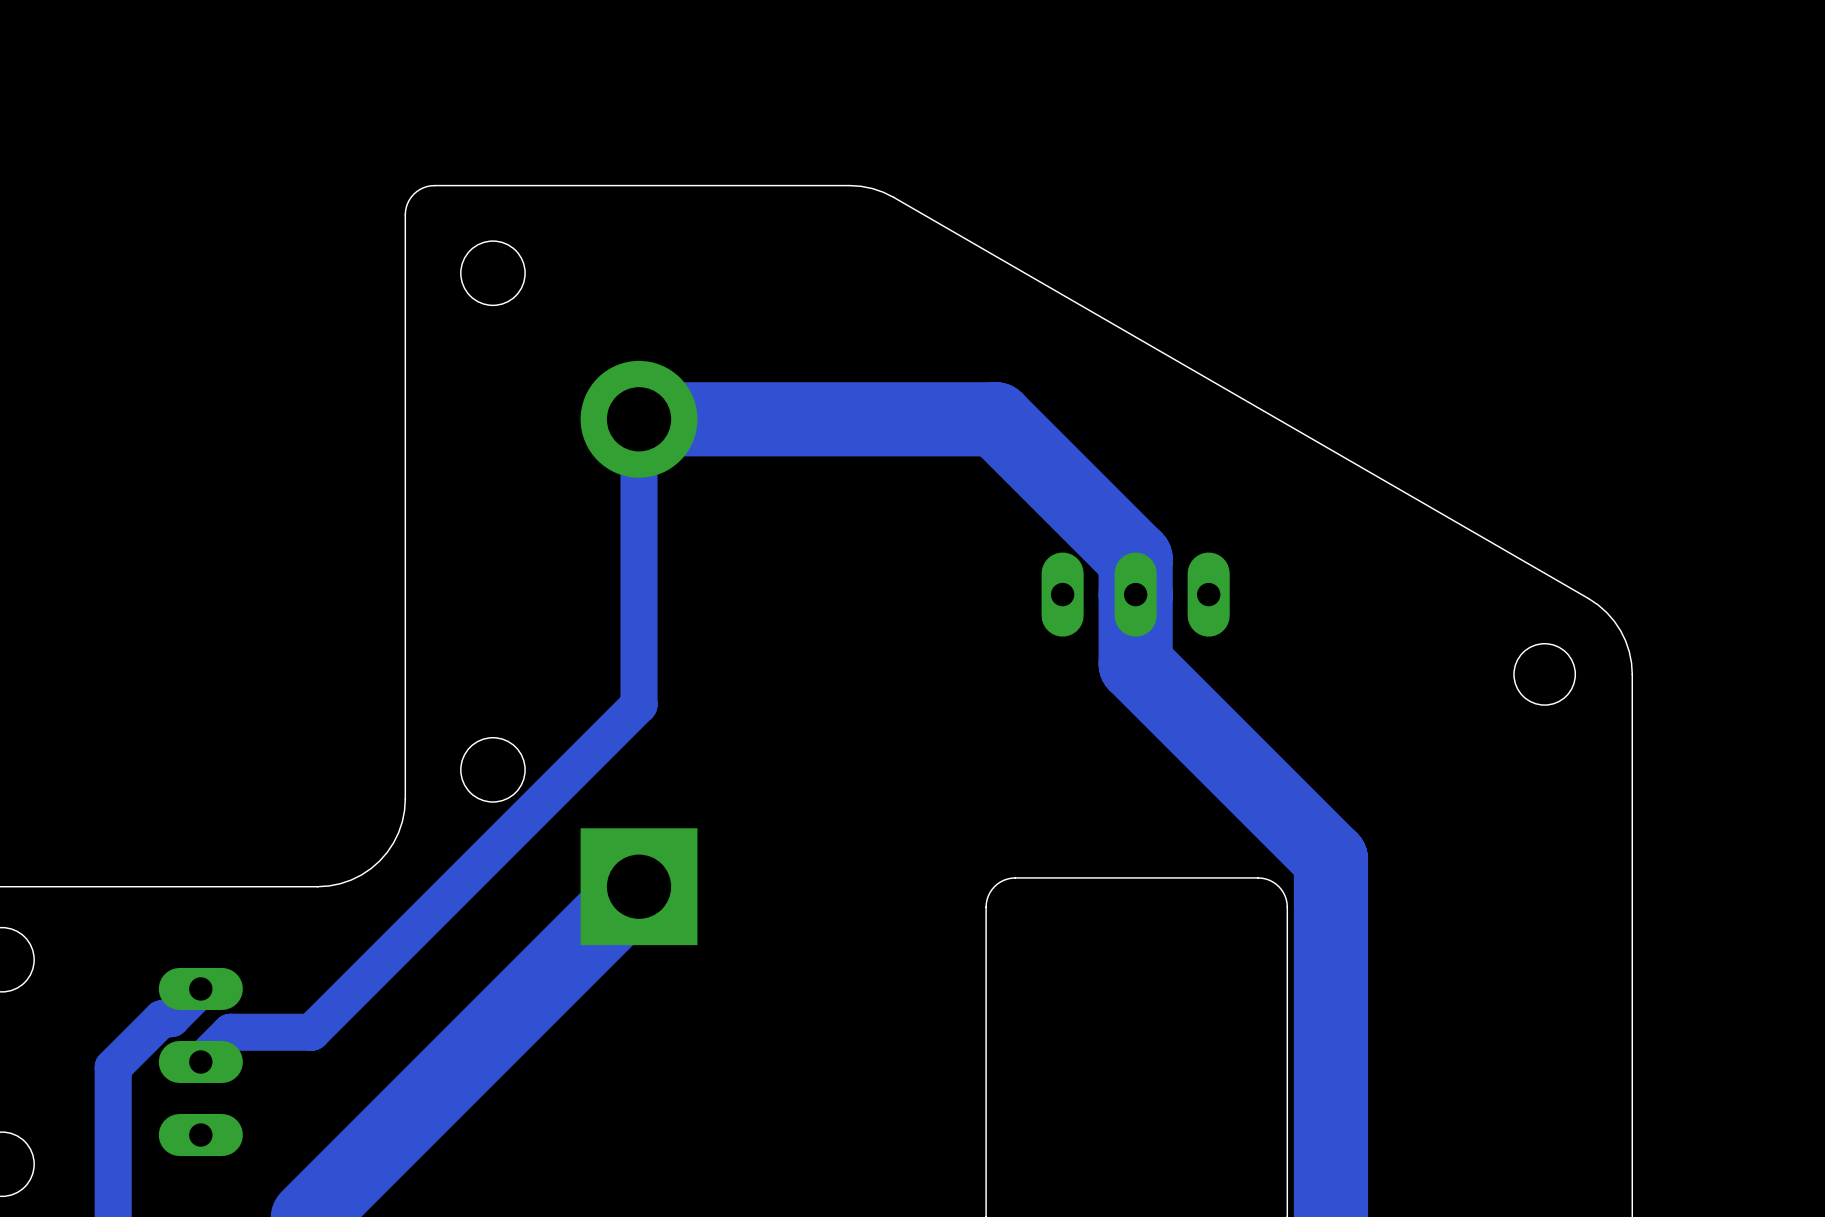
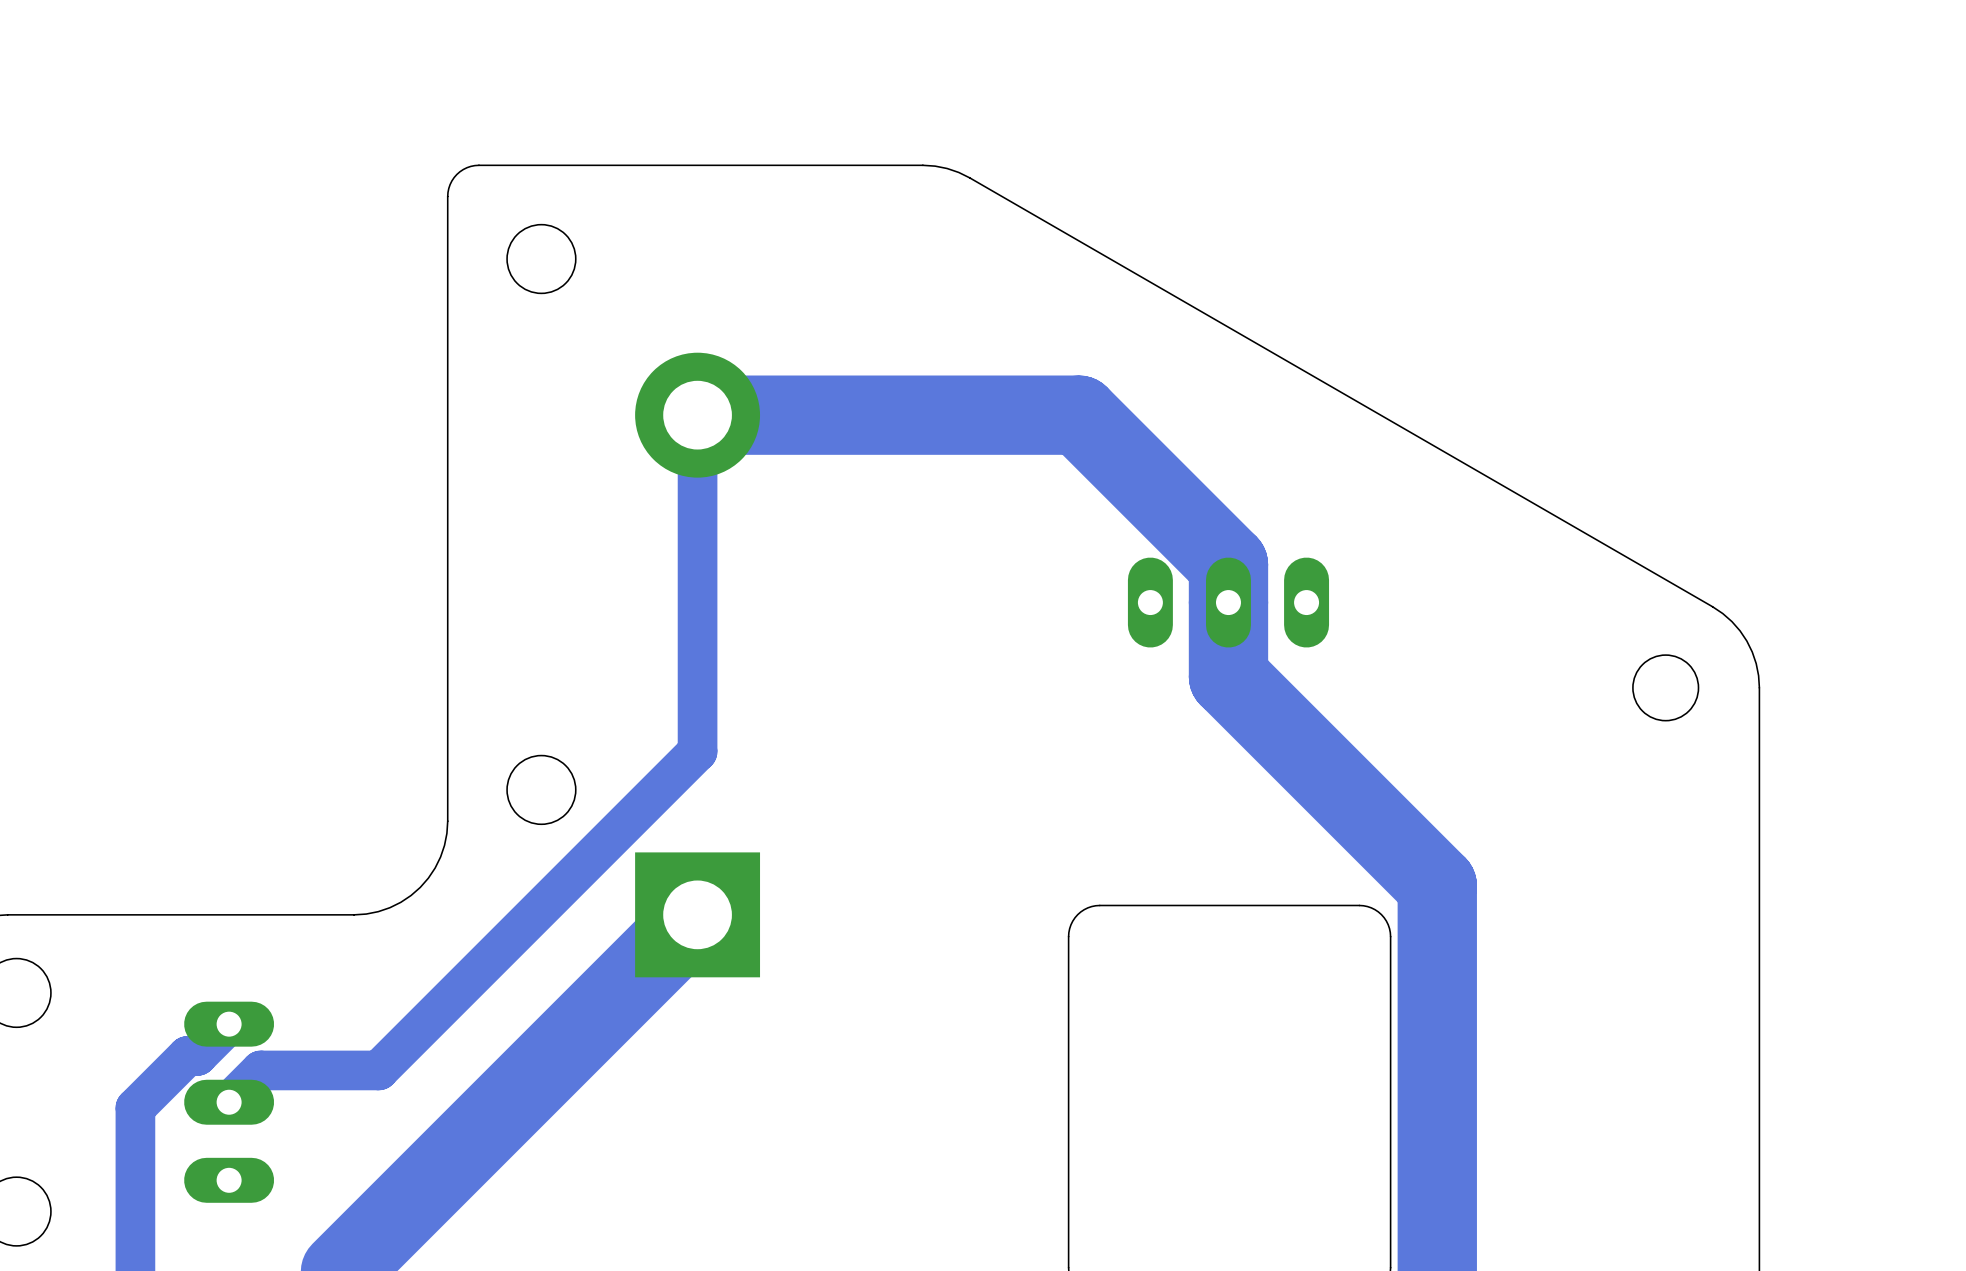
track: (639, 704) (311, 1032) -> (697, 720) (697, 751) (378, 1070) (347, 1070)

